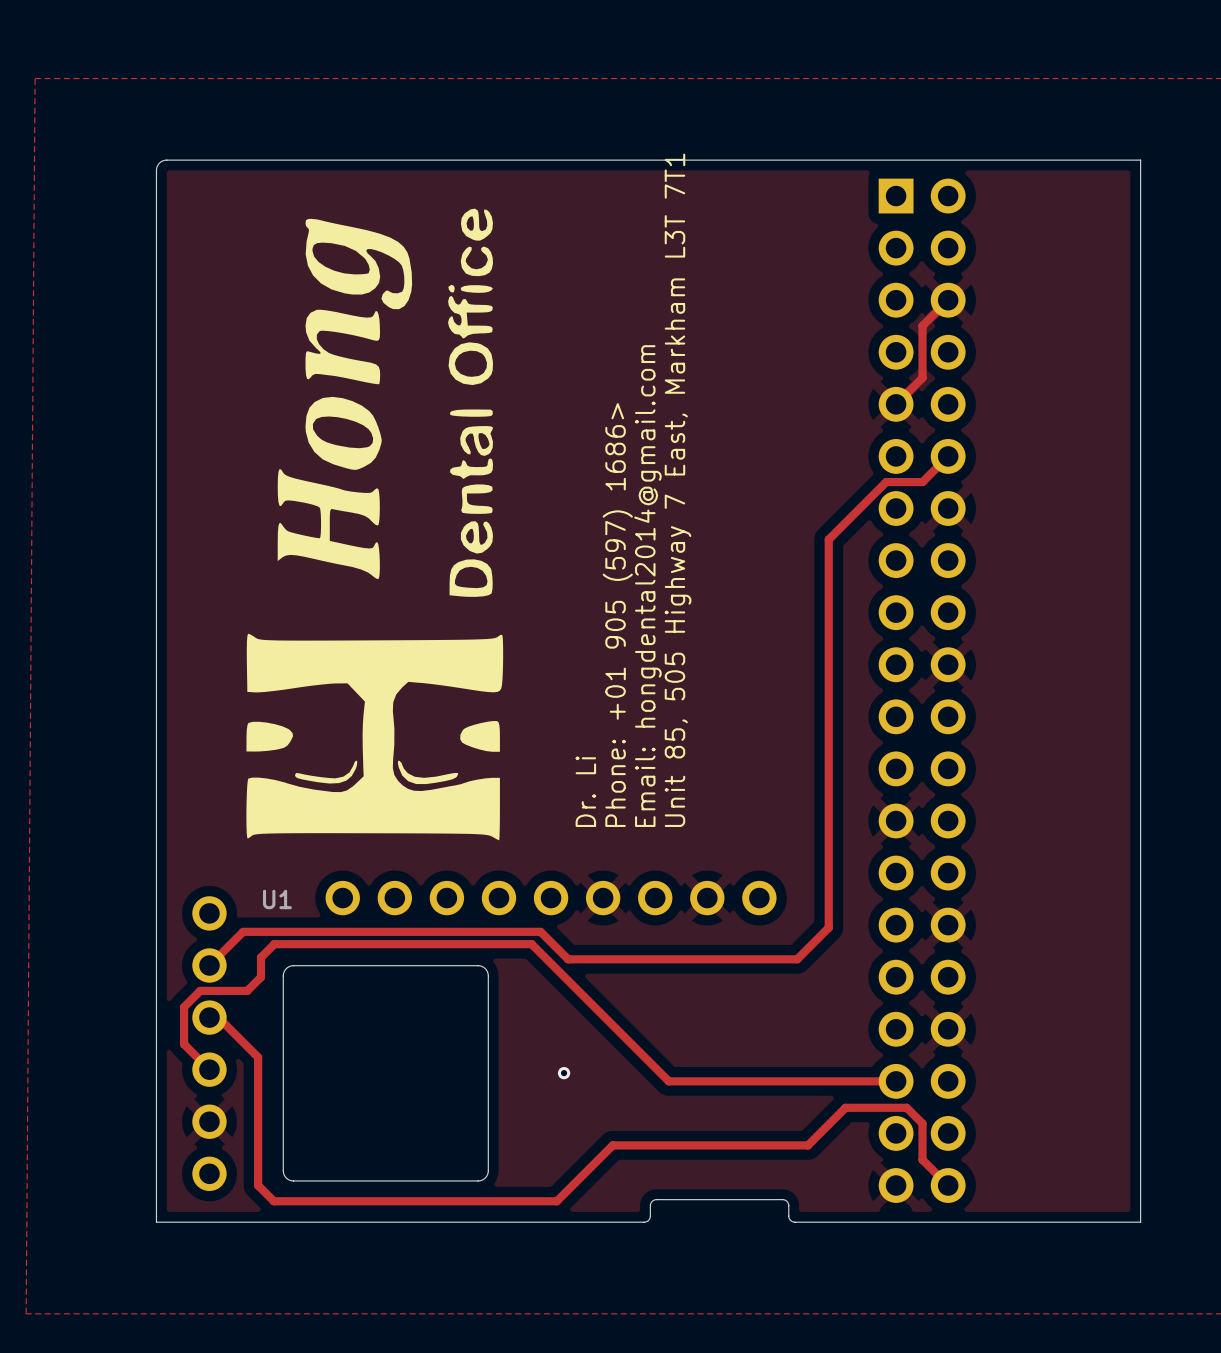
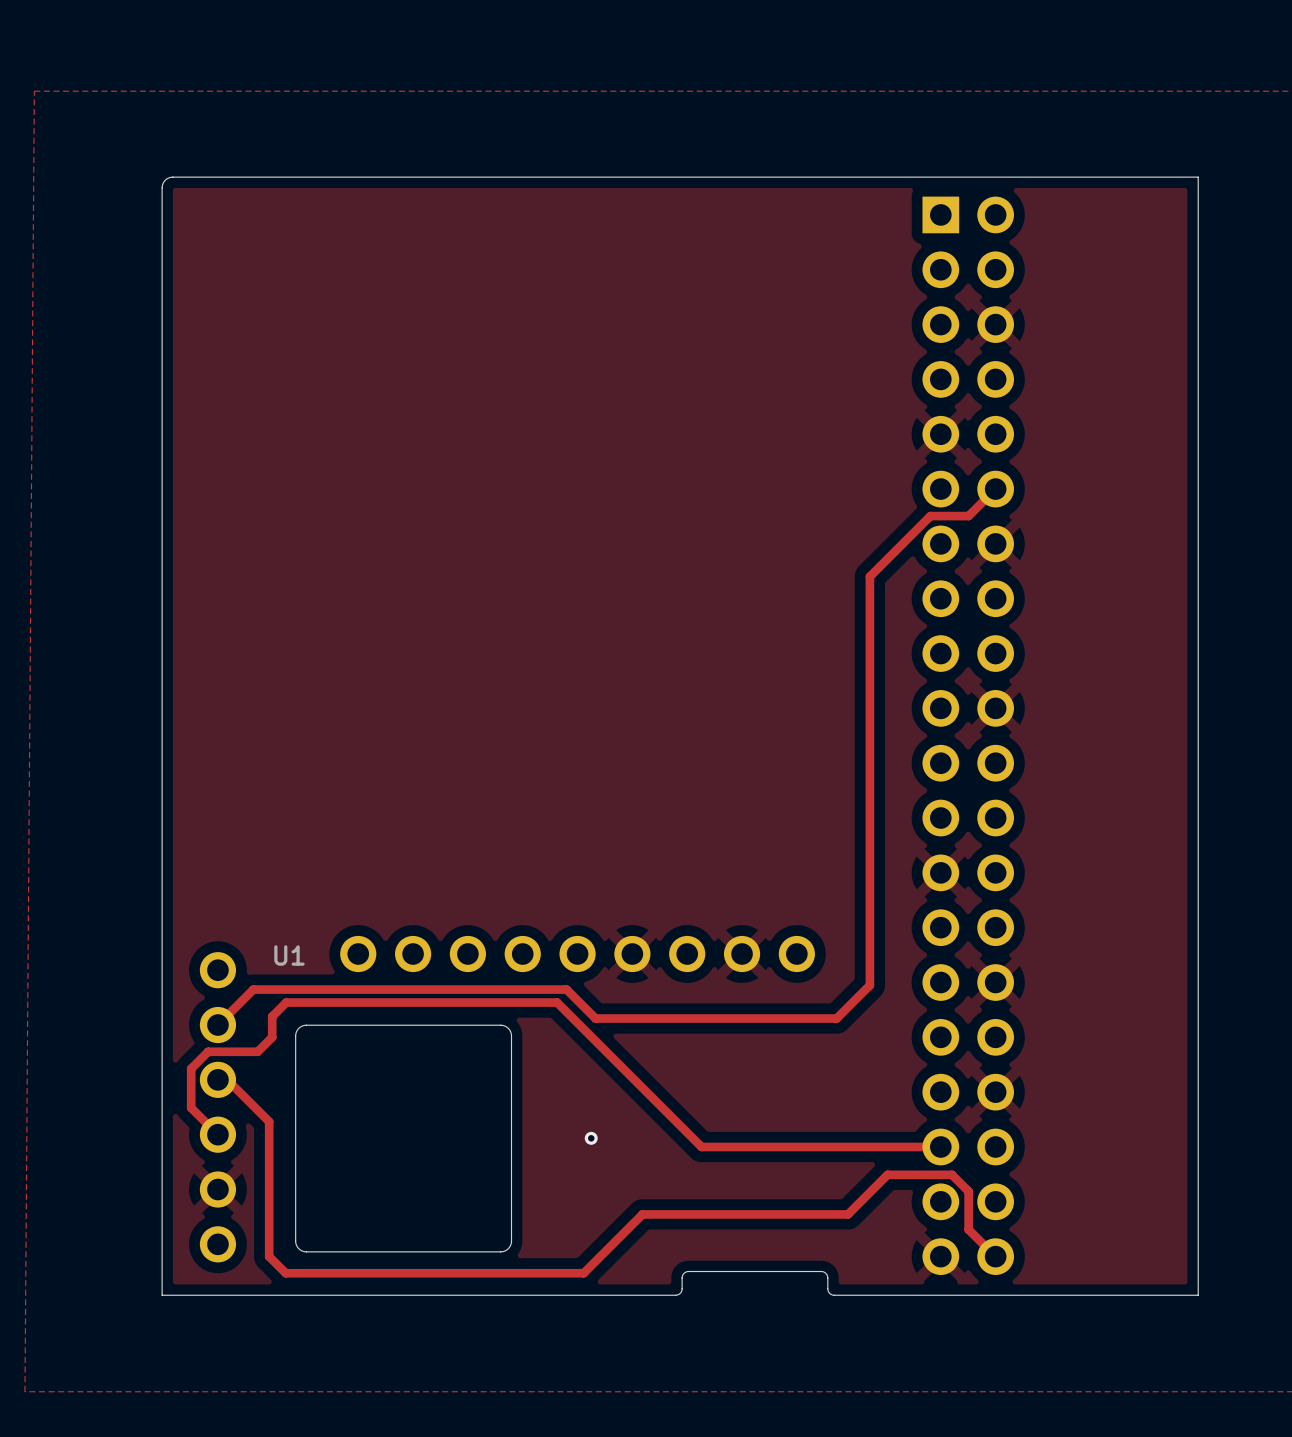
drawing: [246, 208, 504, 841] -> none
track: (948, 300) (922, 325) (922, 377) (896, 404) -> none
text: Unit 85, 505 Highway 7 East, Markham L3T 7T1 (678, 490) -> none
text: Email: hongdental2014@gmail.com (647, 586) -> none
text: Phone: +01 905 (597) 1686> (617, 615) -> none
text: Dr. Li (585, 791) -> none

